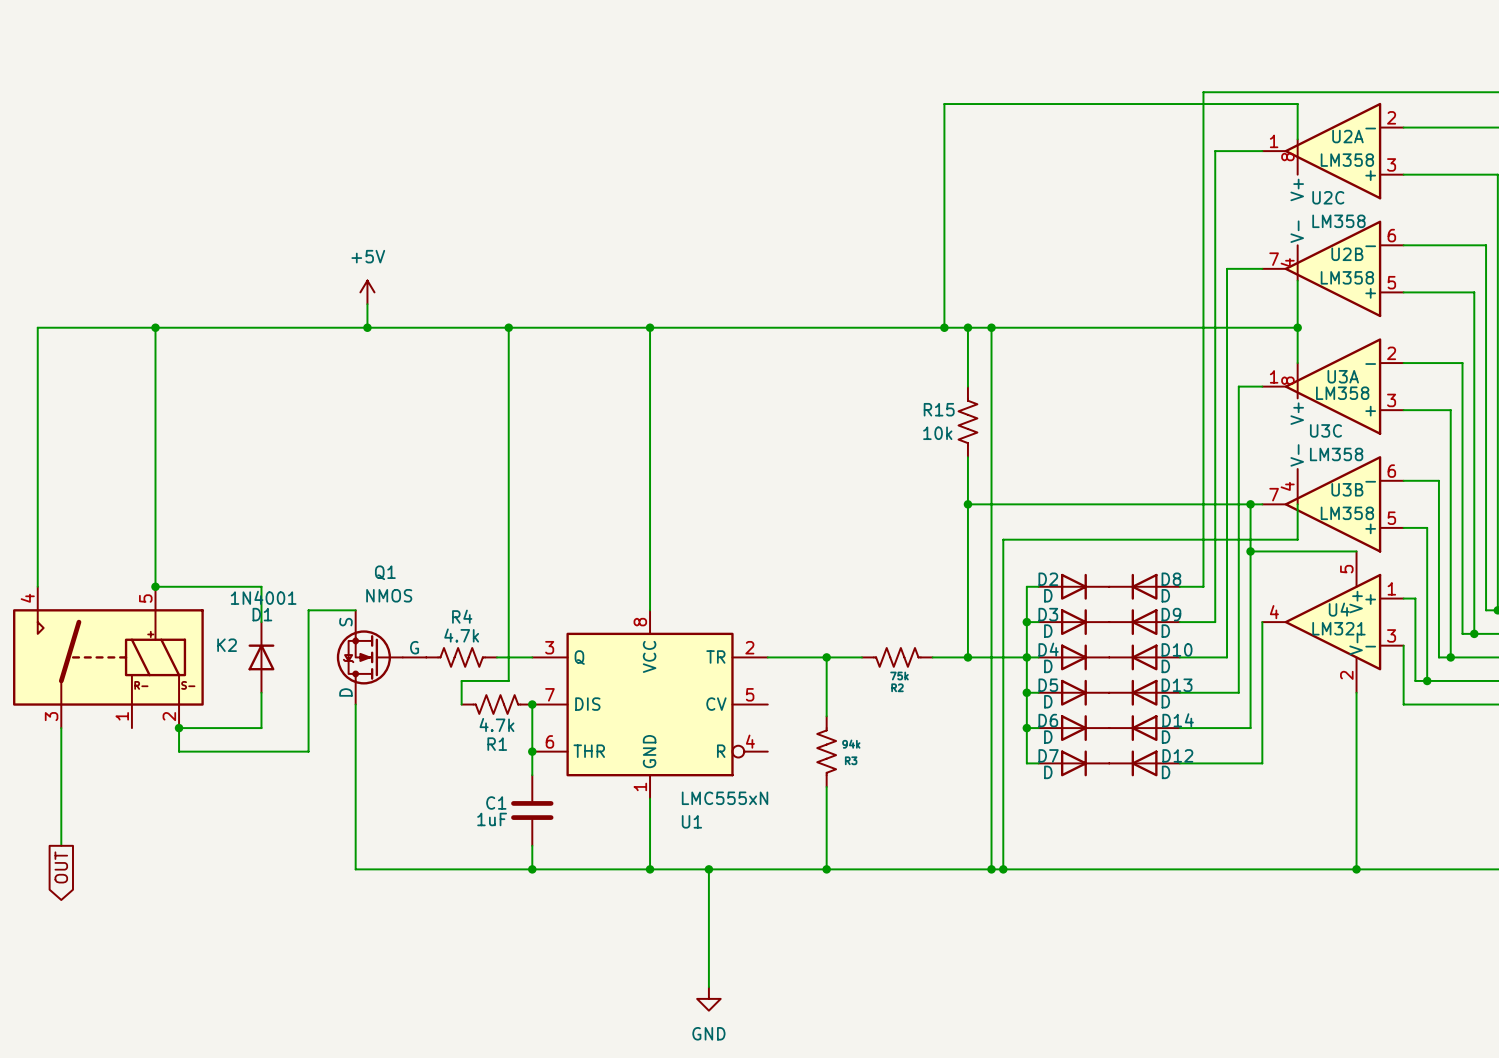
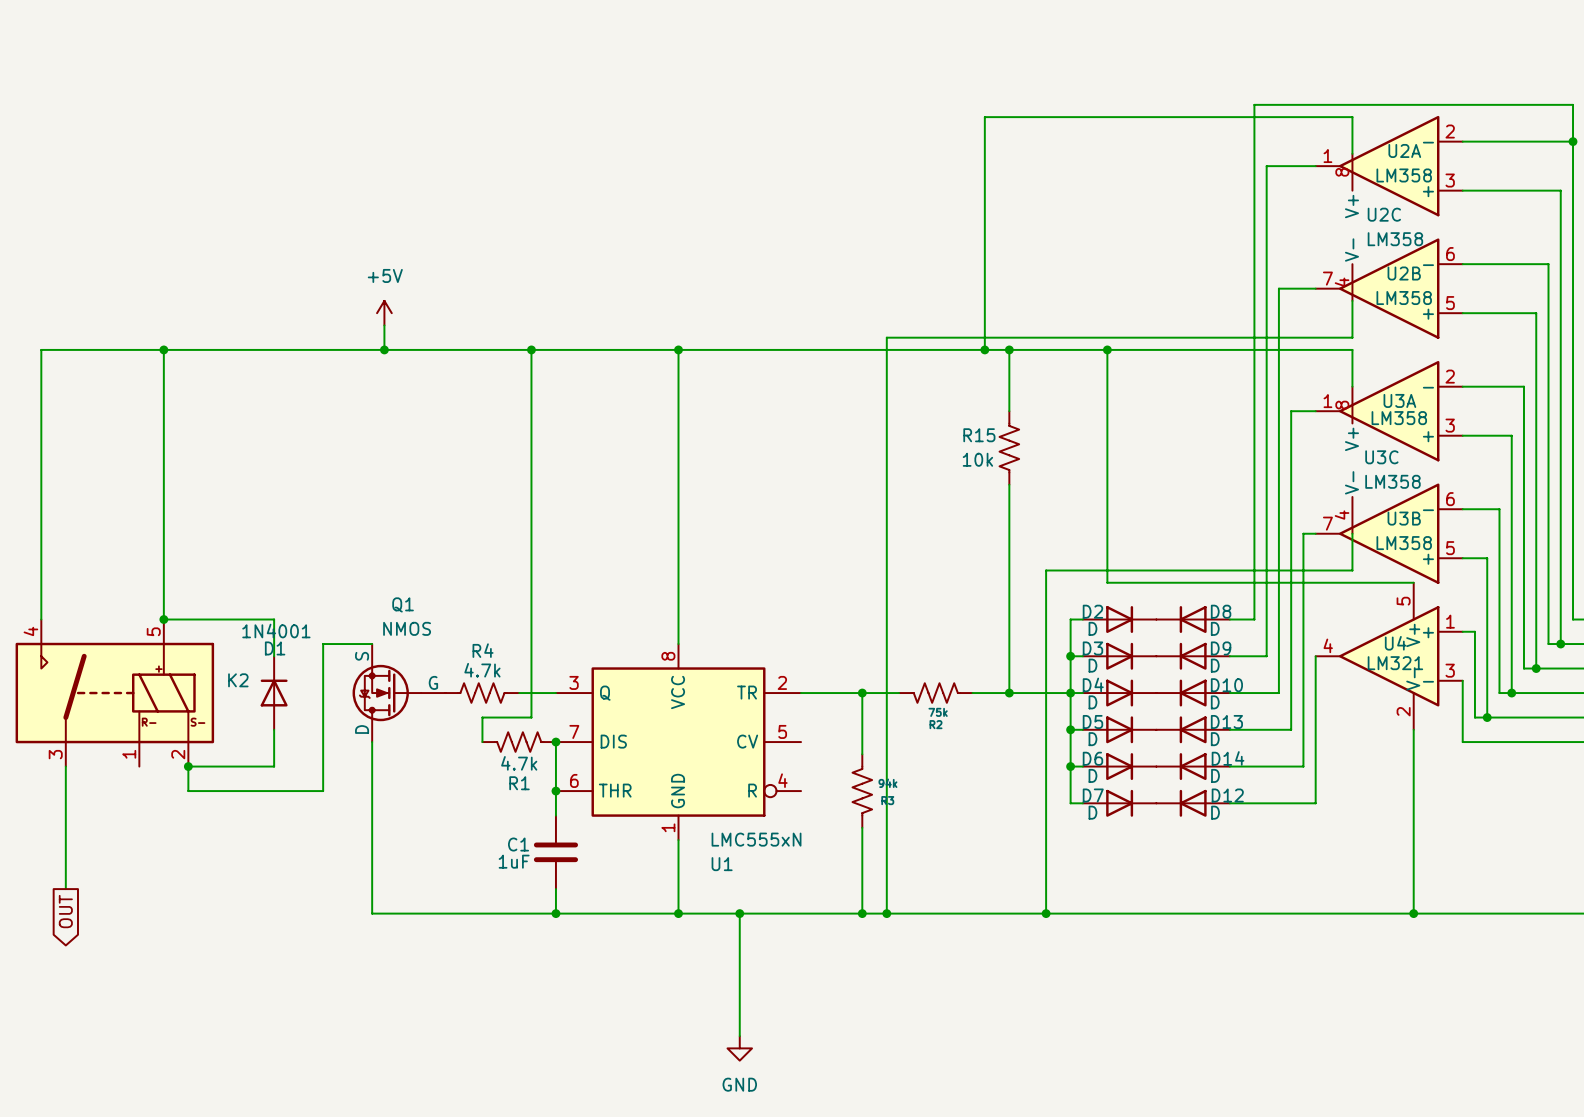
wire: (1297, 315) (1297, 327) -> (1352, 337) (886, 337) (886, 913)
wire: (991, 327) (991, 869) -> none
junction: (991, 327) -> none
wire: none -> (1107, 349) (1107, 582) (1303, 582)
junction: none -> (1107, 349)
junction: (1297, 327) -> none
wire: (967, 504) (1250, 504) -> none
junction: (967, 504) -> none
junction: (1250, 504) -> none
junction: (1250, 551) -> none
junction: none -> (886, 913)
junction: (991, 869) -> none

